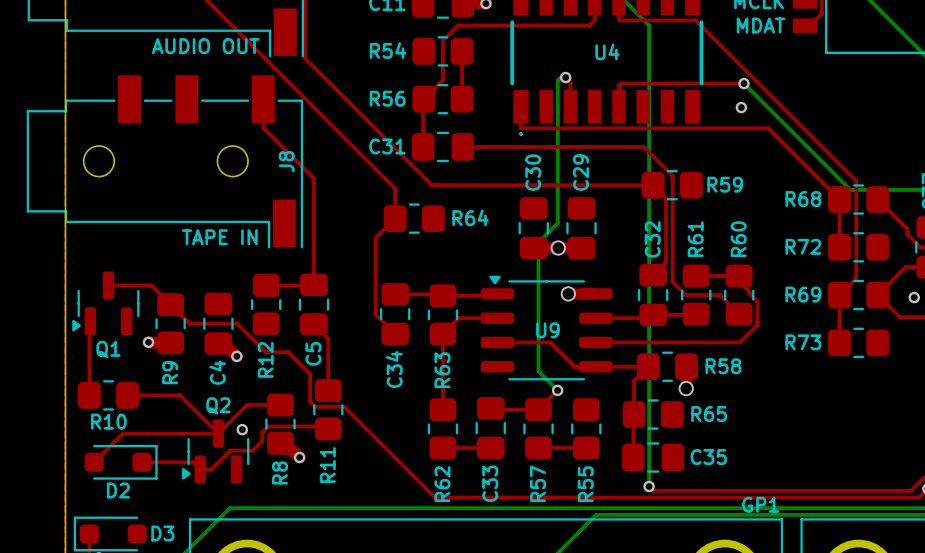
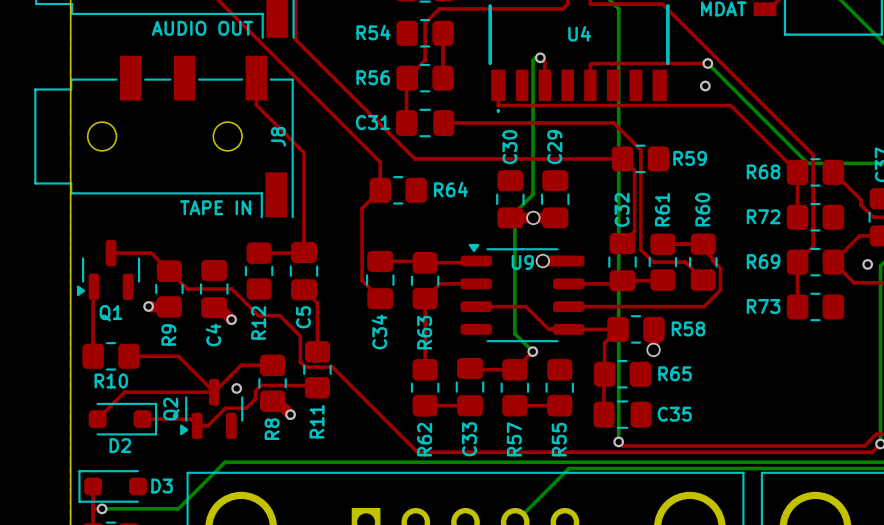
U9 name position: U9 (547, 330) -> U9 (522, 262)
Q2 name rotation: 0° (218, 405) -> 90° counterclockwise (171, 409)
Q2 name position: Q2 (218, 405) -> Q2 (171, 409)
text: GP1 (760, 504) -> none

